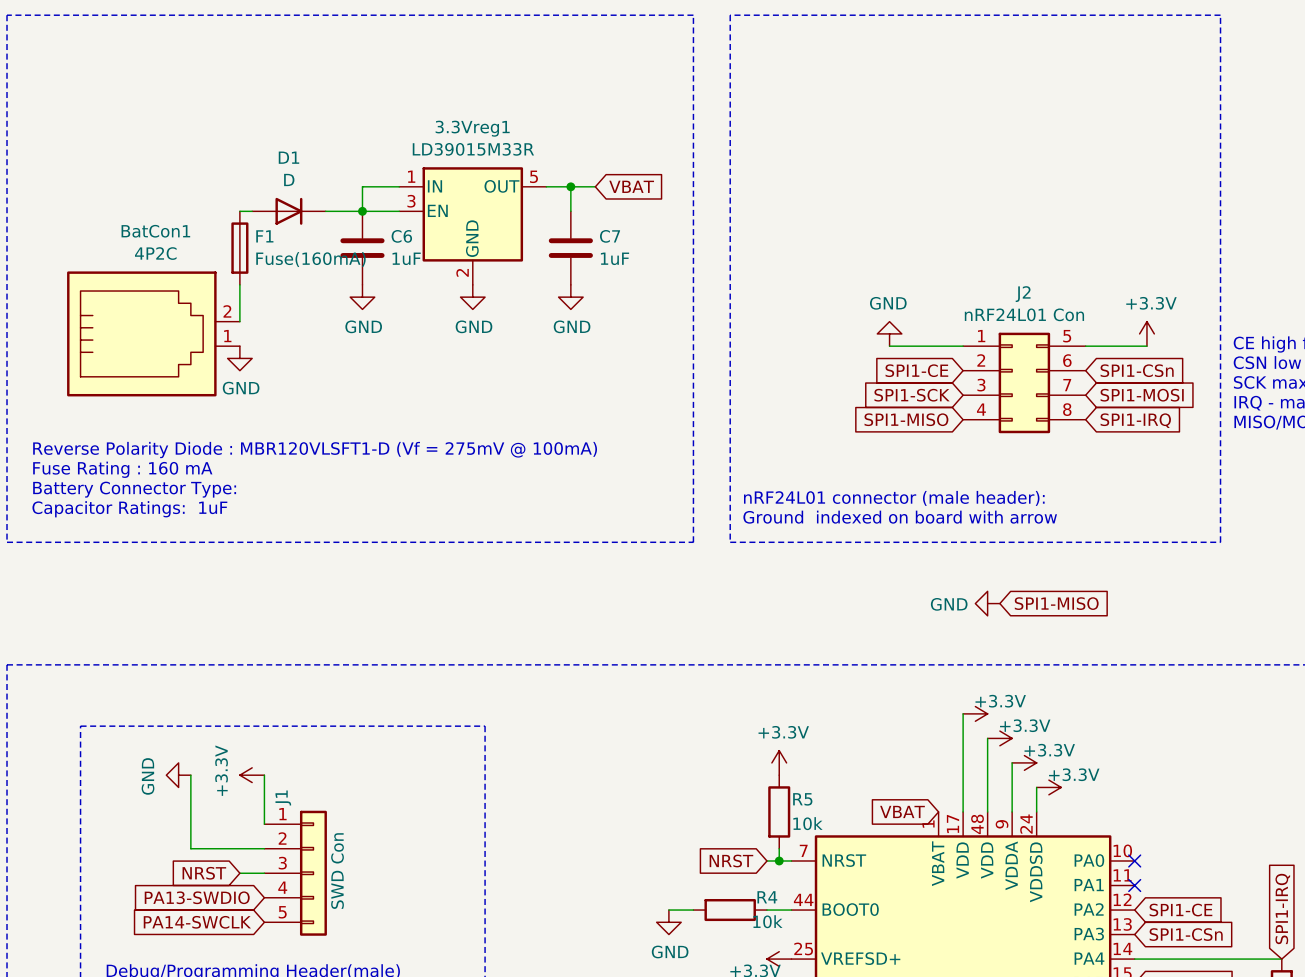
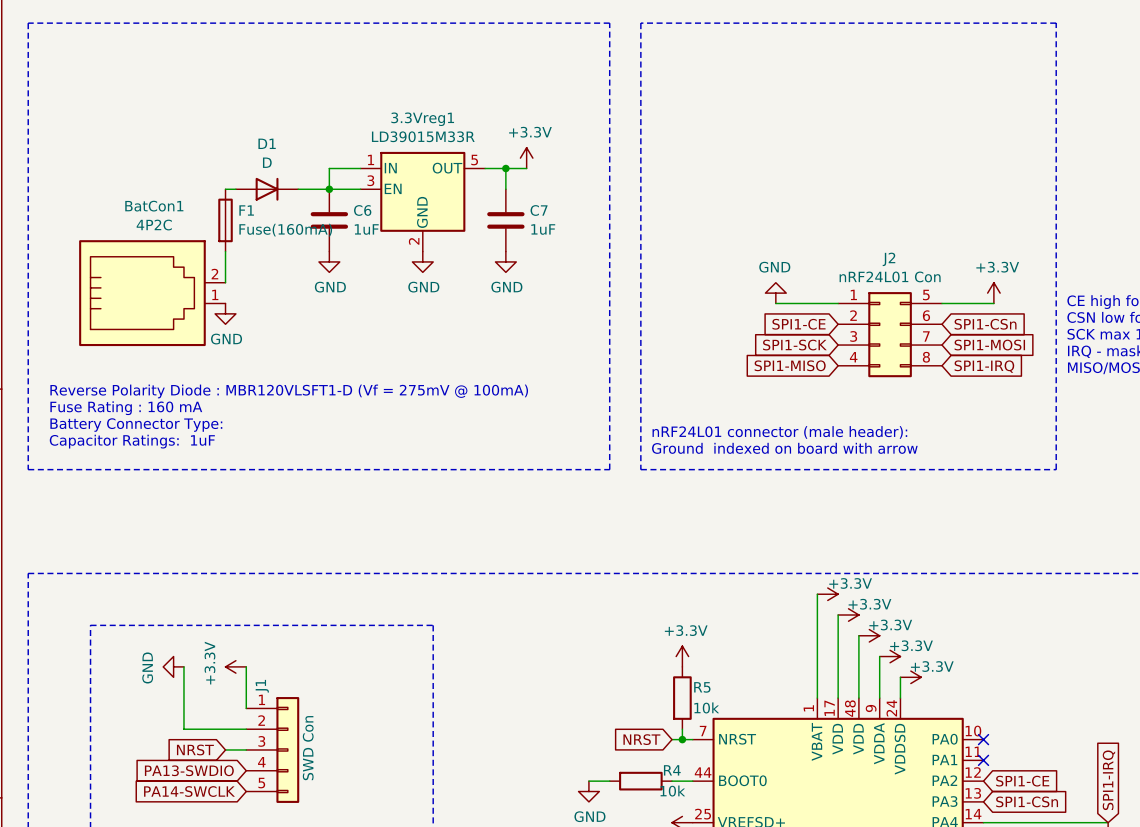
power symbol: none -> +3.3V (526, 158)
global label: VBAT (631, 186) -> none
power symbol: GND (987, 603) -> none
global label: SPI1-MISO (1056, 603) -> none
wire: none -> (817, 594) (817, 698)
power symbol: none -> +3.3V (827, 594)
global label: VBAT (902, 811) -> none

